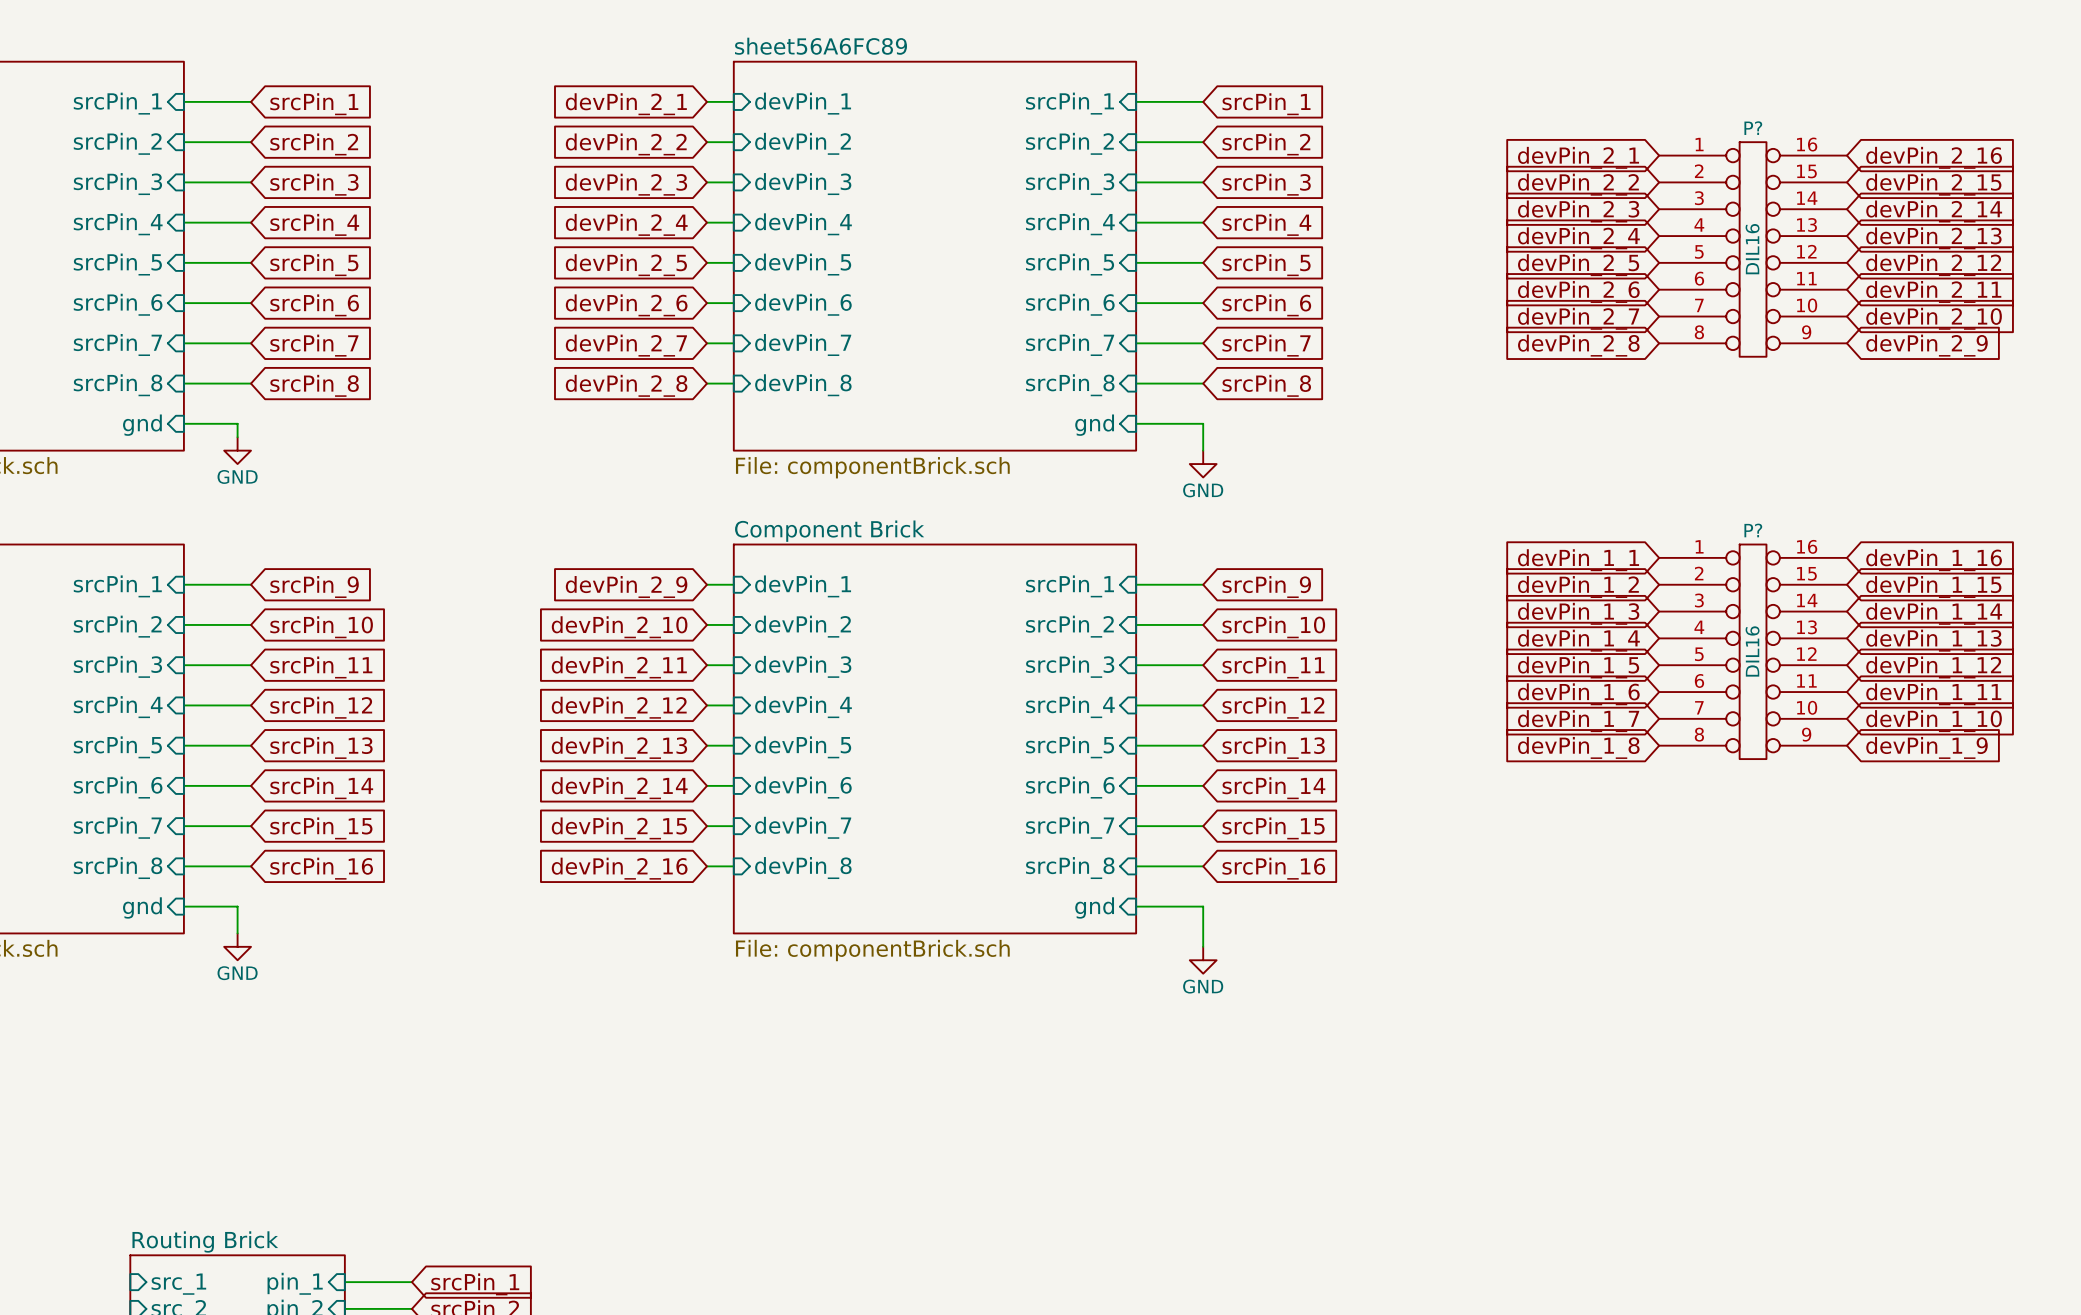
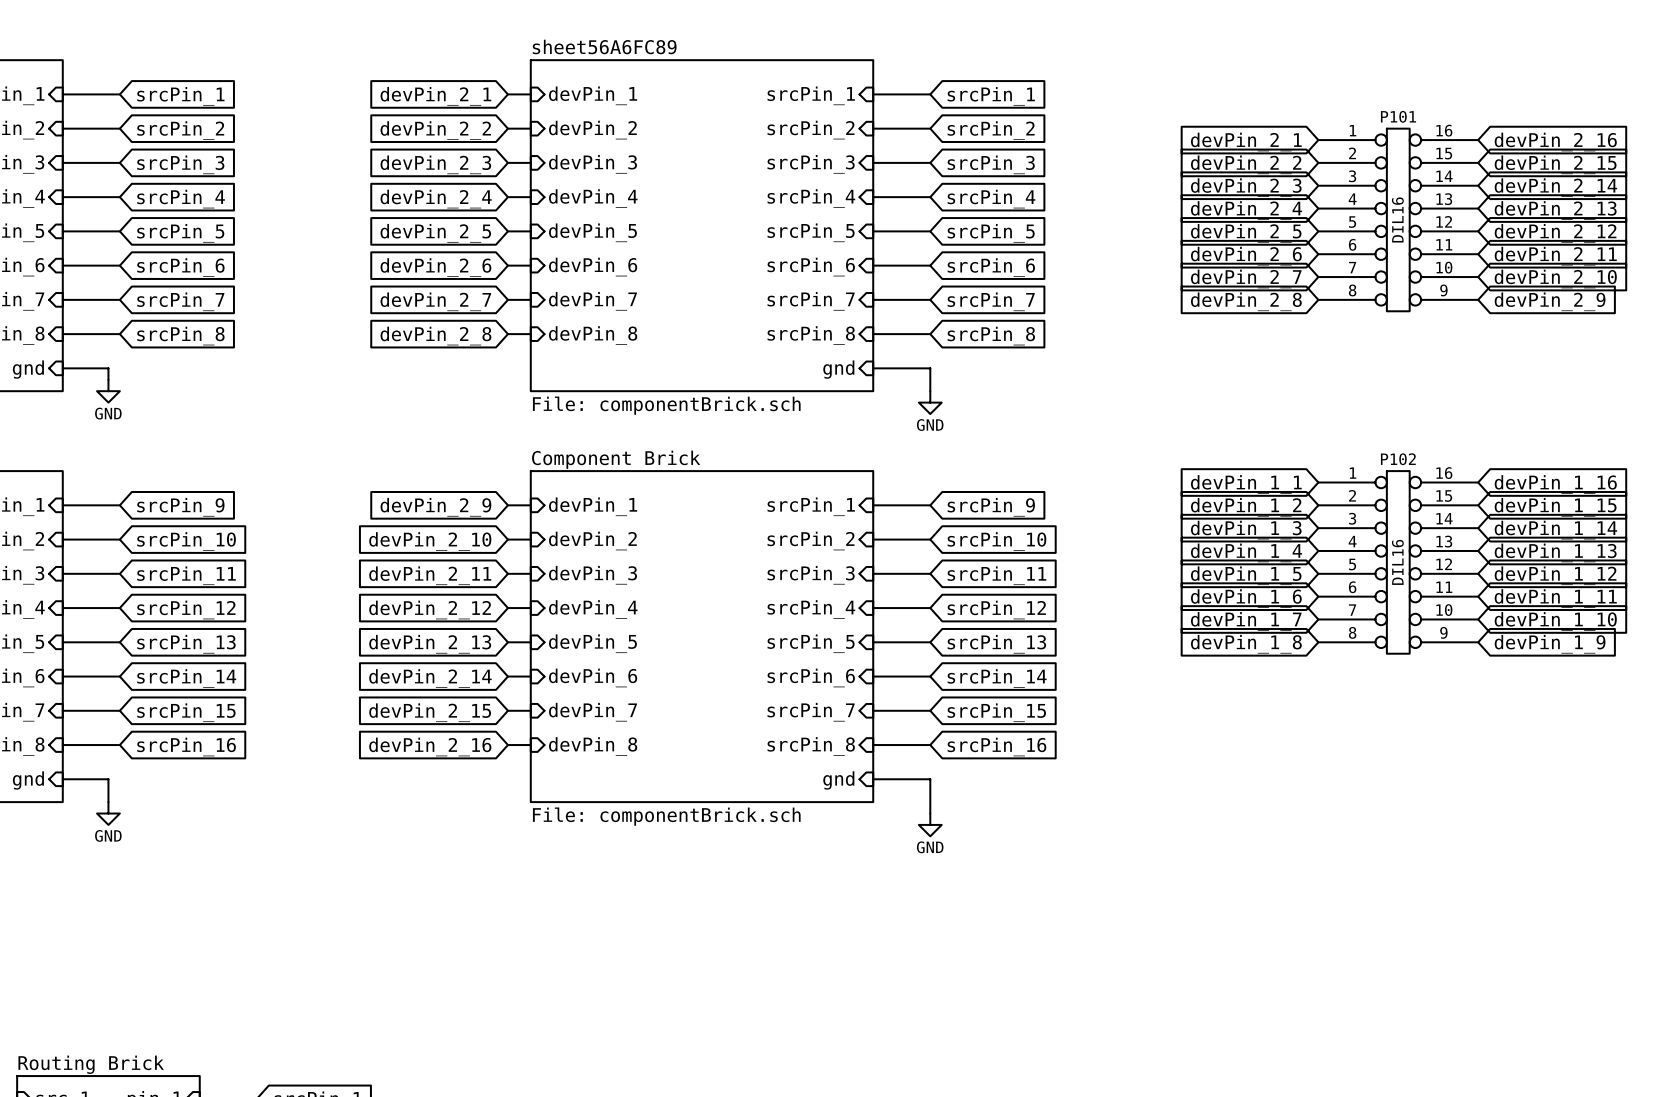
P? name: P? (1753, 128) -> P101 (1398, 116)
P? name: P? (1753, 530) -> P102 (1398, 459)

